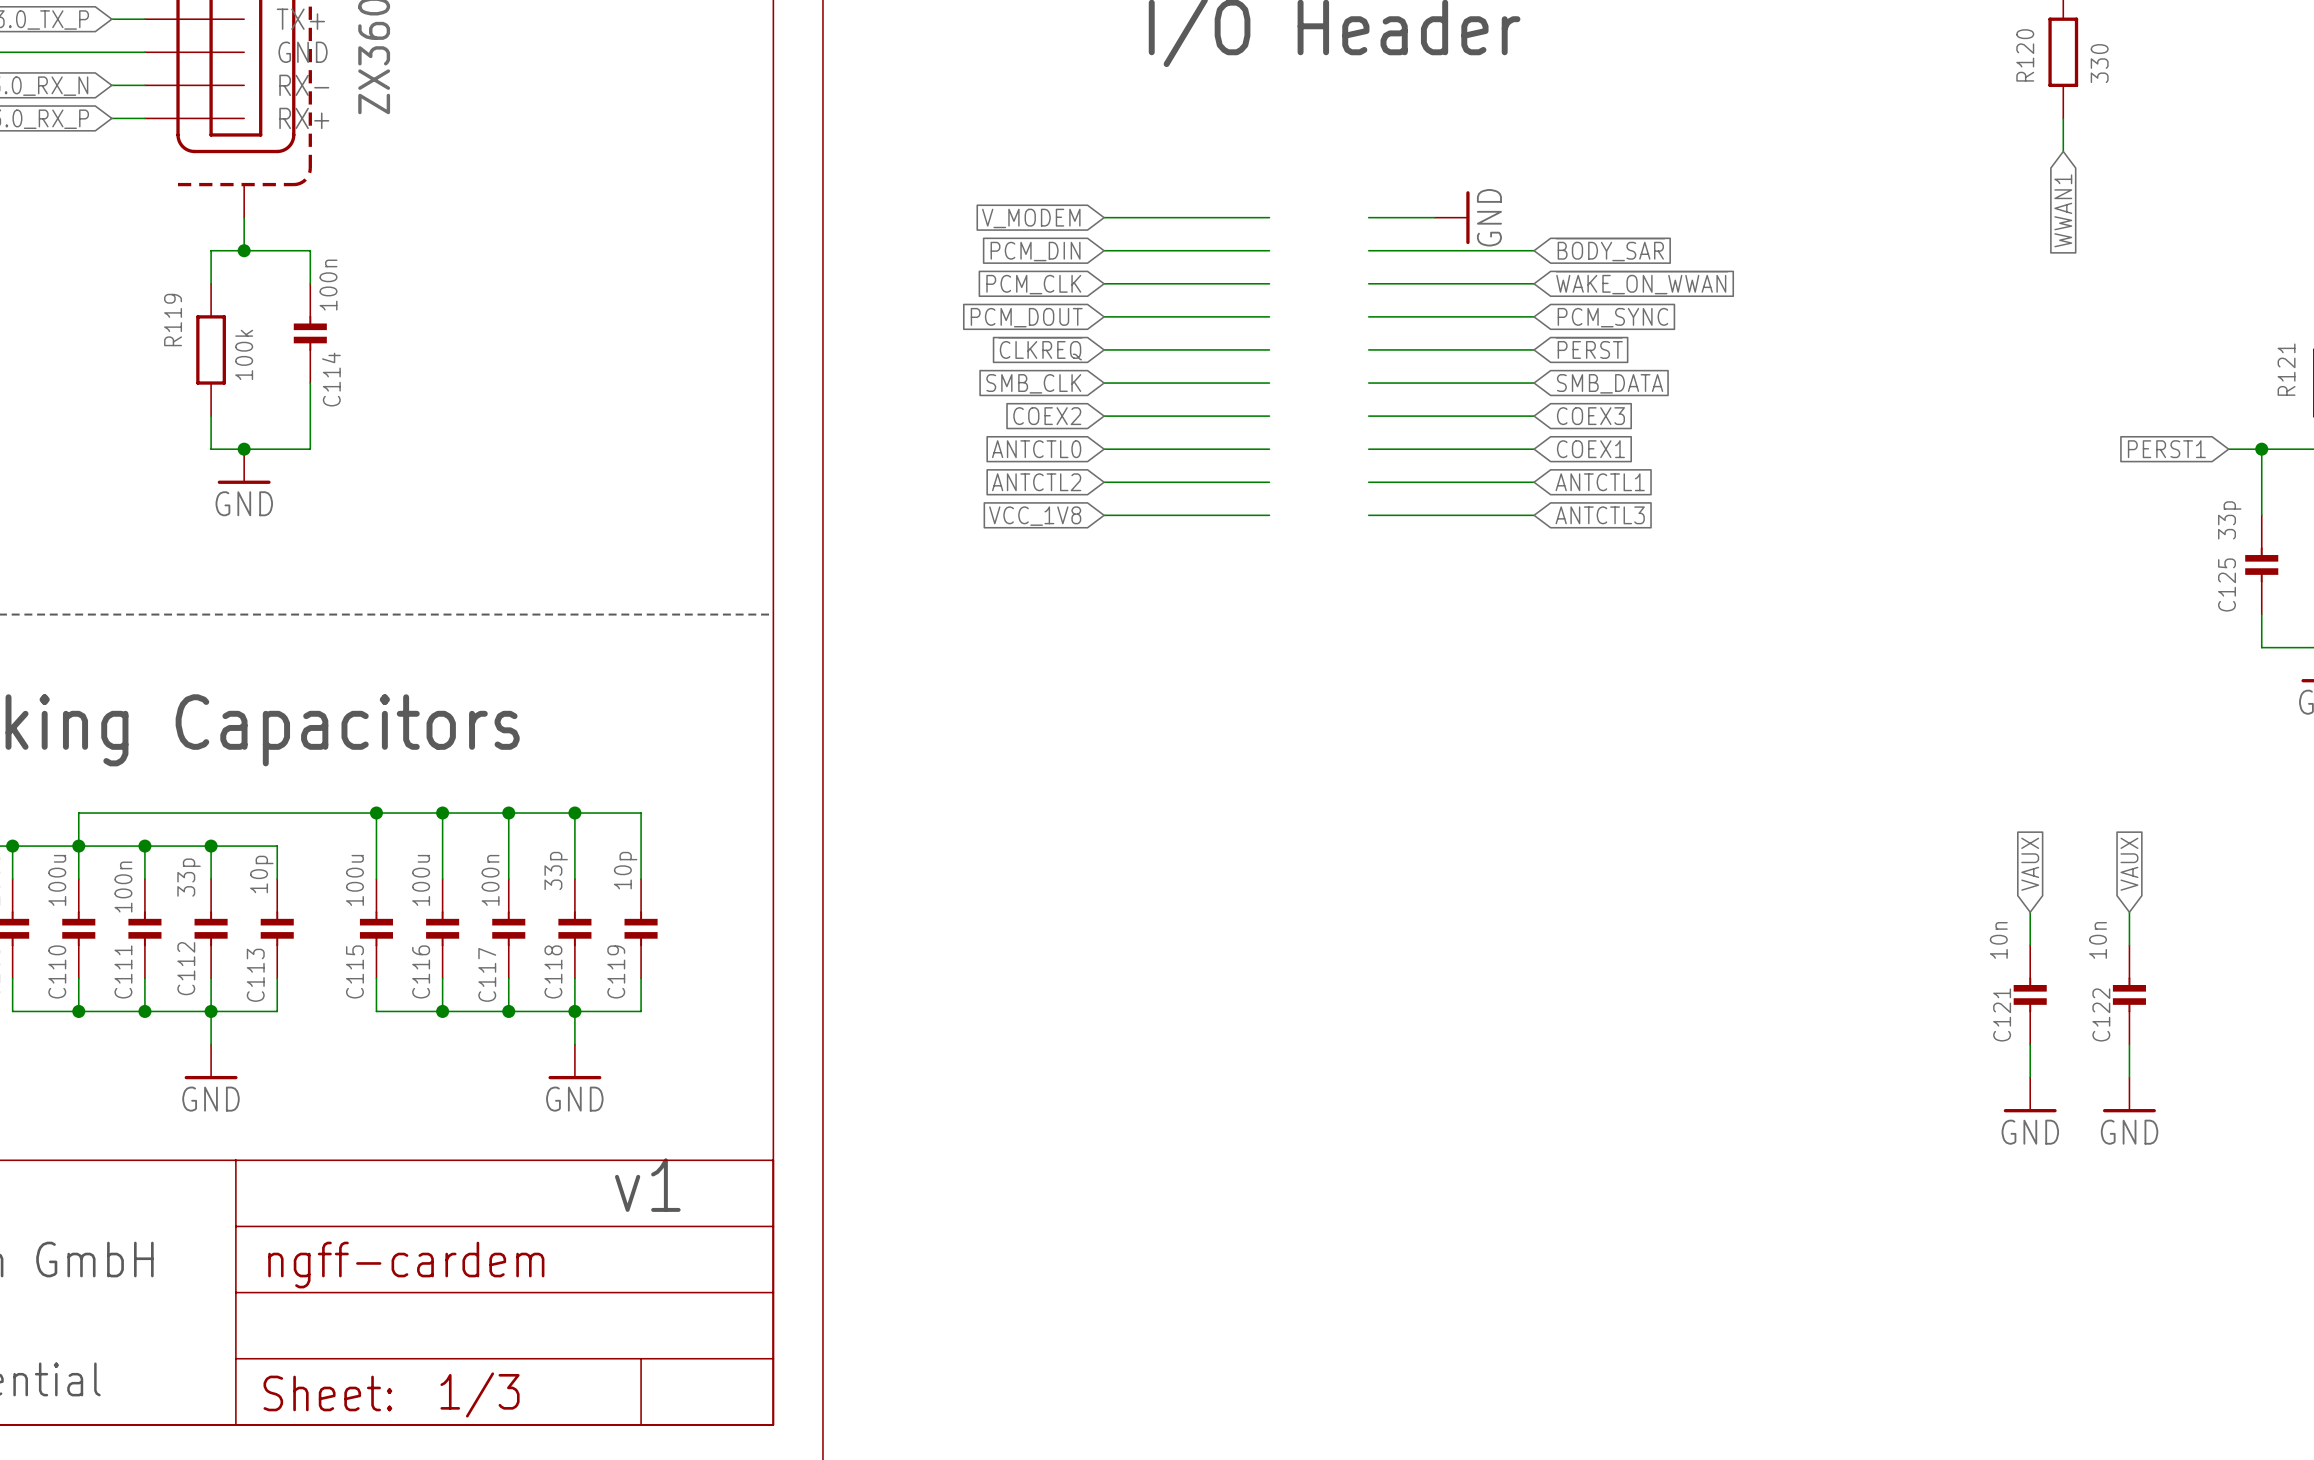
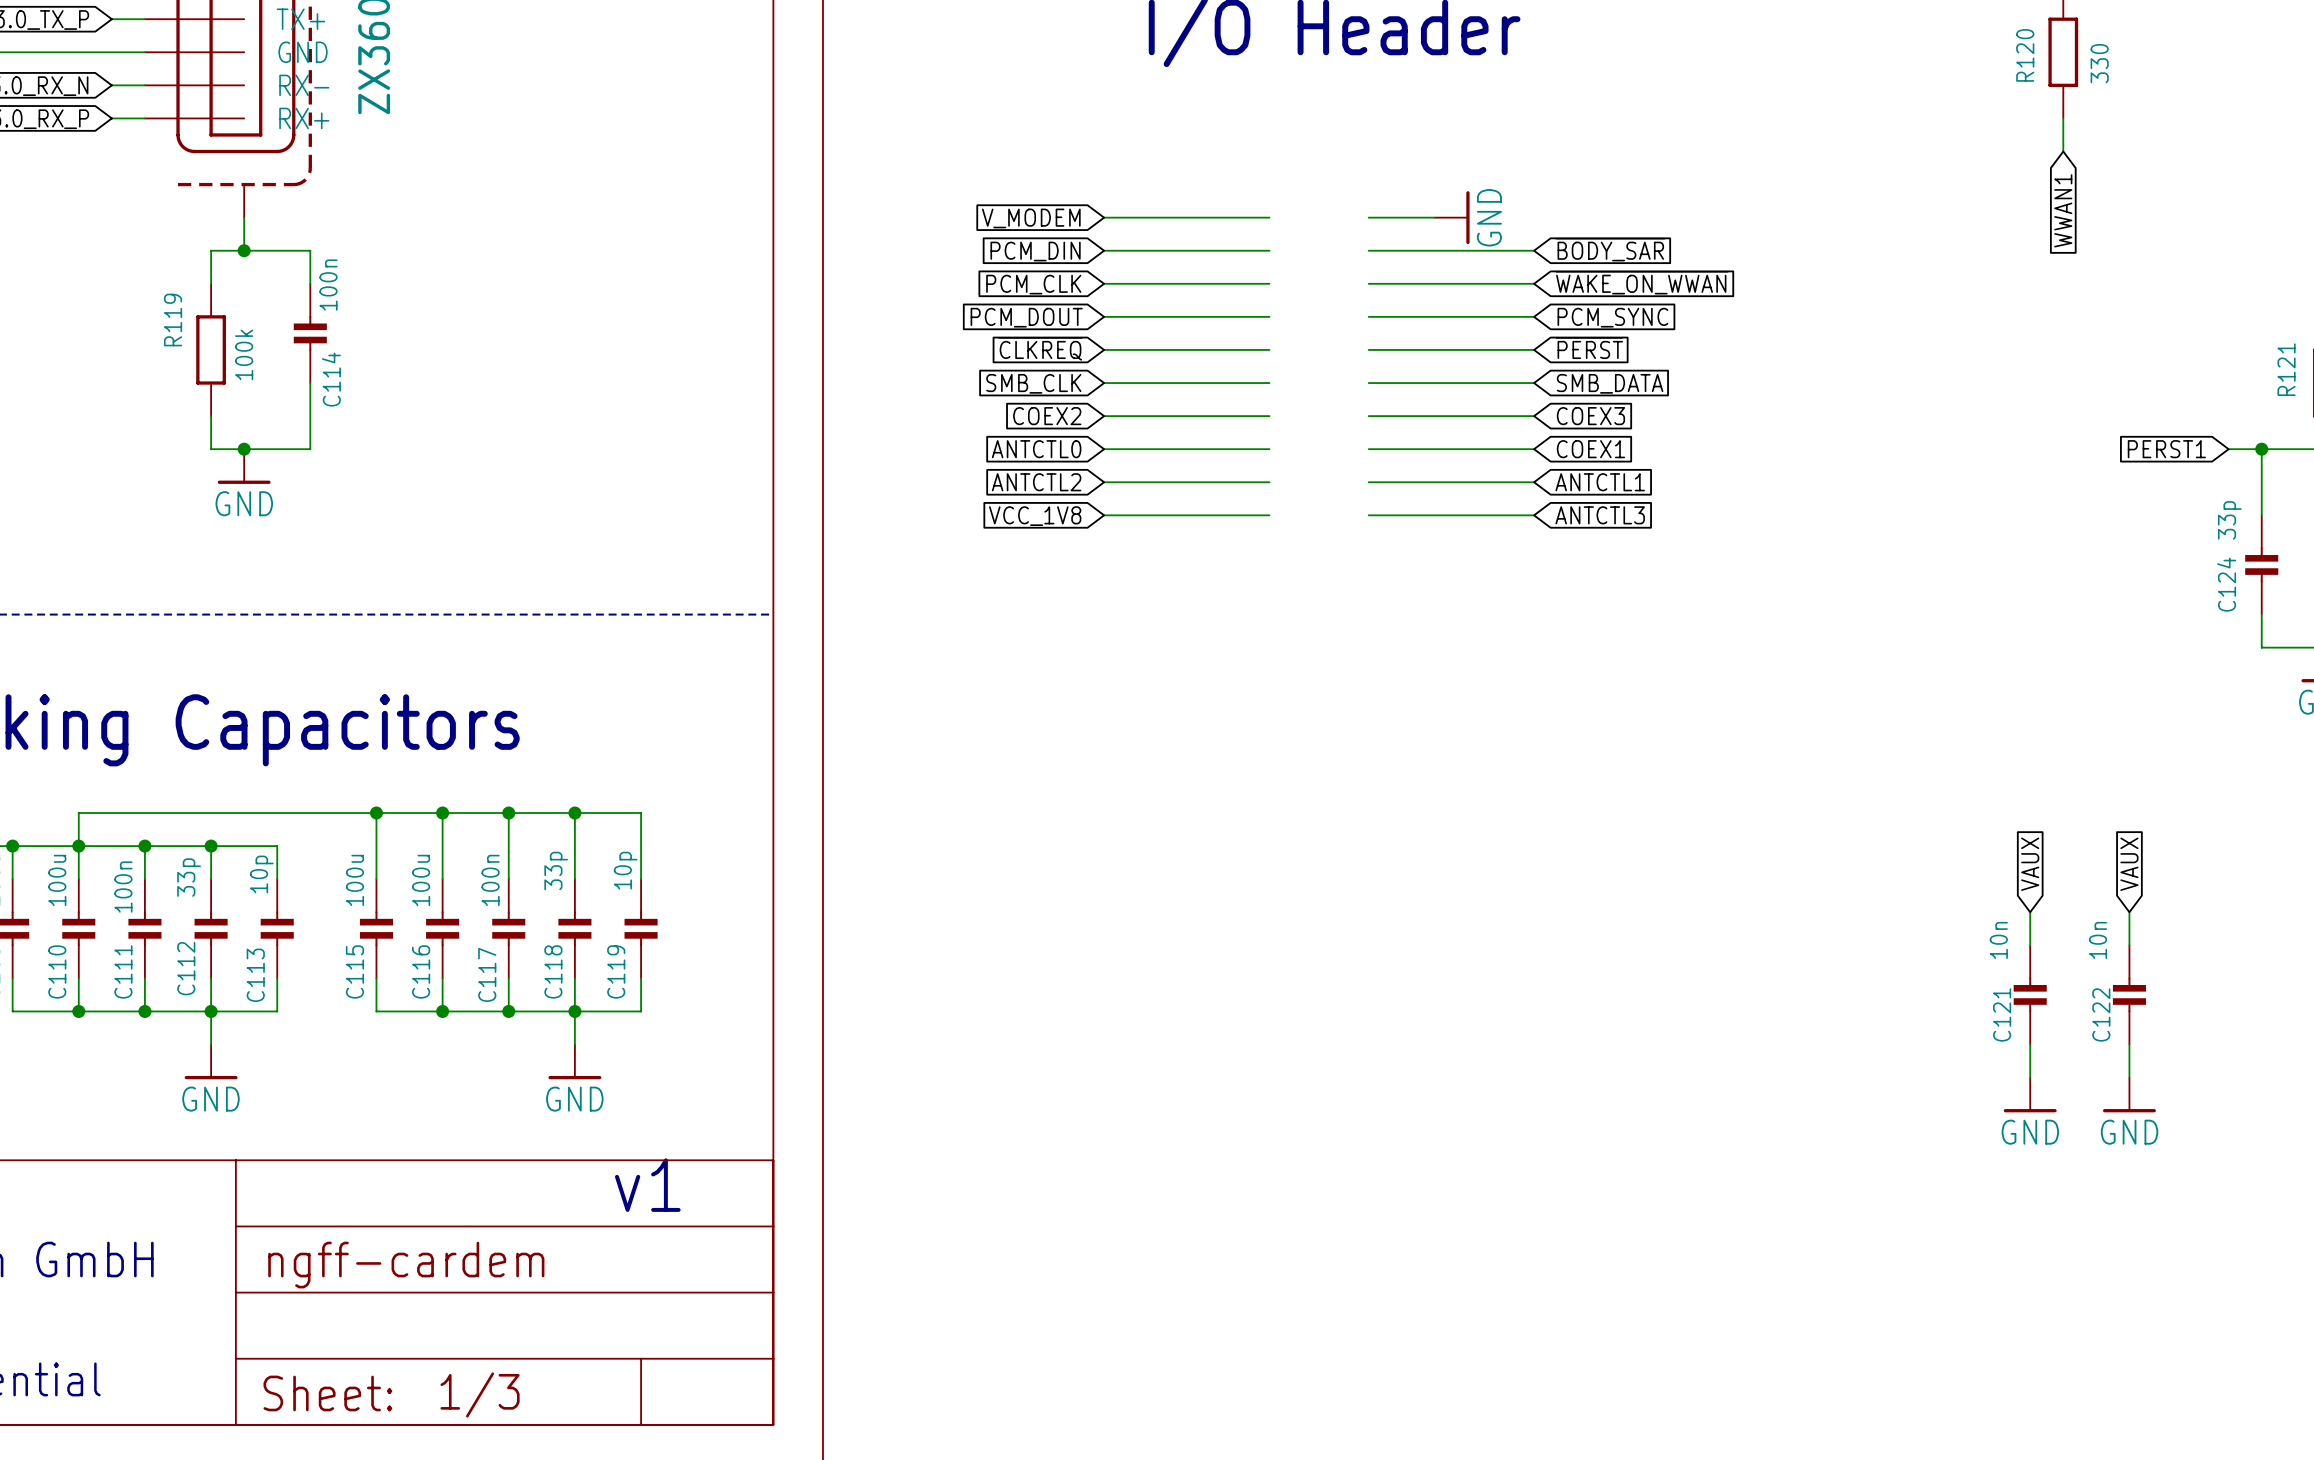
C125 name: C125 (2227, 584) -> C124 (2226, 584)

